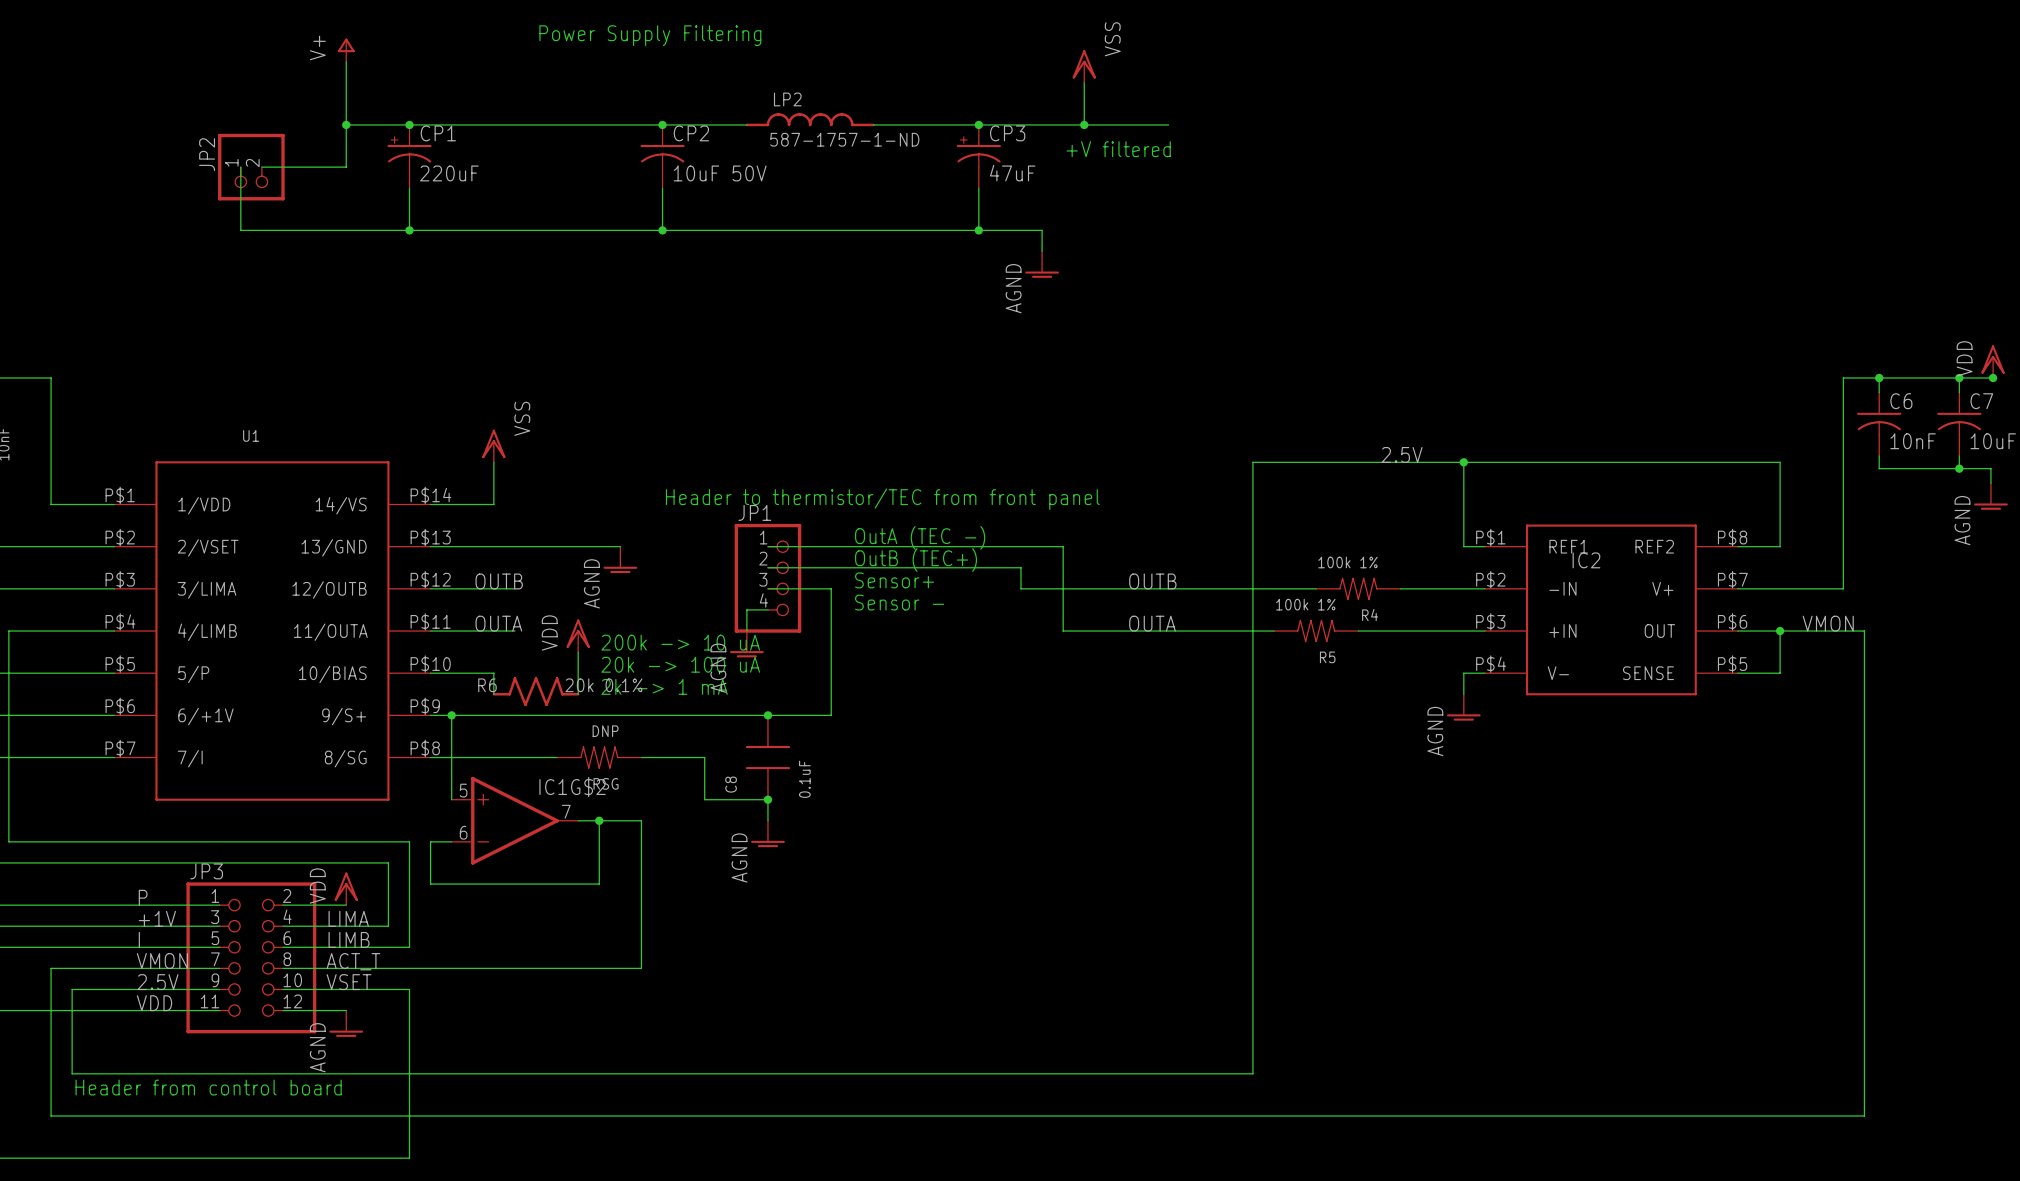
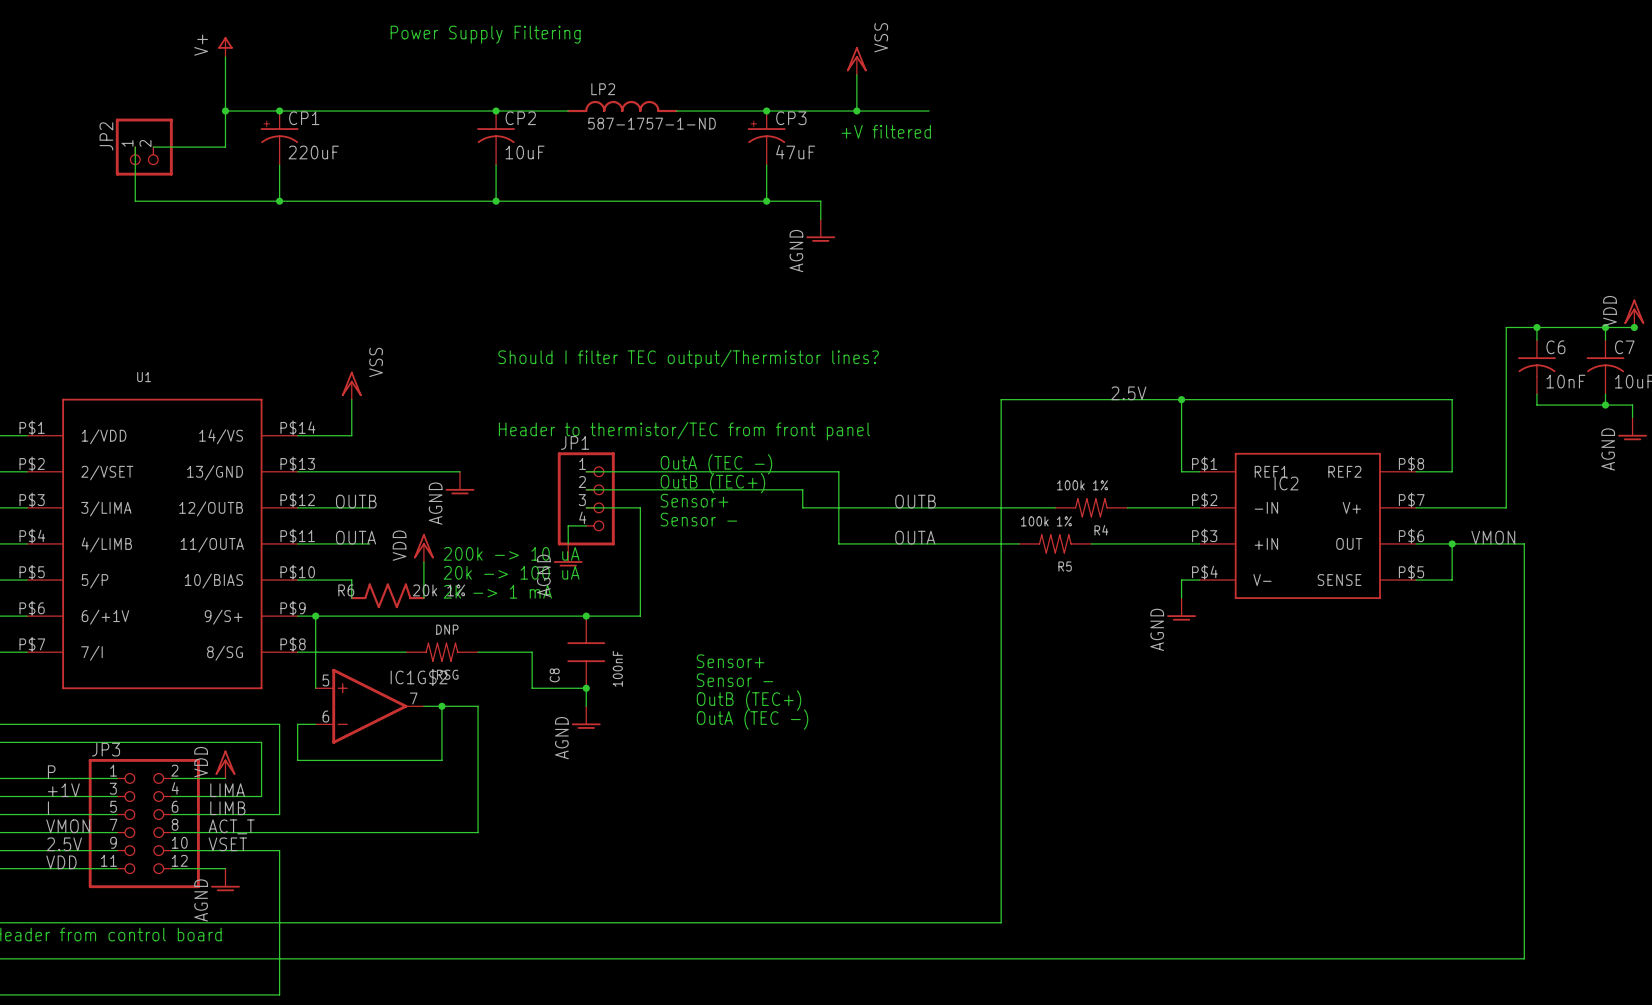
CP2 value: 10uF 50V (720, 173) -> 10uF (525, 152)
text: none -> Should I filter TEC output/Thermistor lines? (688, 359)
R6 value: 20k 0.1% (603, 685) -> 20k 1% (438, 590)
text: none -> Sensor+ (730, 661)
C8 value: 0.1uF (804, 779) -> 100nF (617, 668)
text: none -> Sensor - (734, 680)
text: none -> OutB (TEC+) (749, 700)
text: none -> OutA (TEC -) (752, 719)

